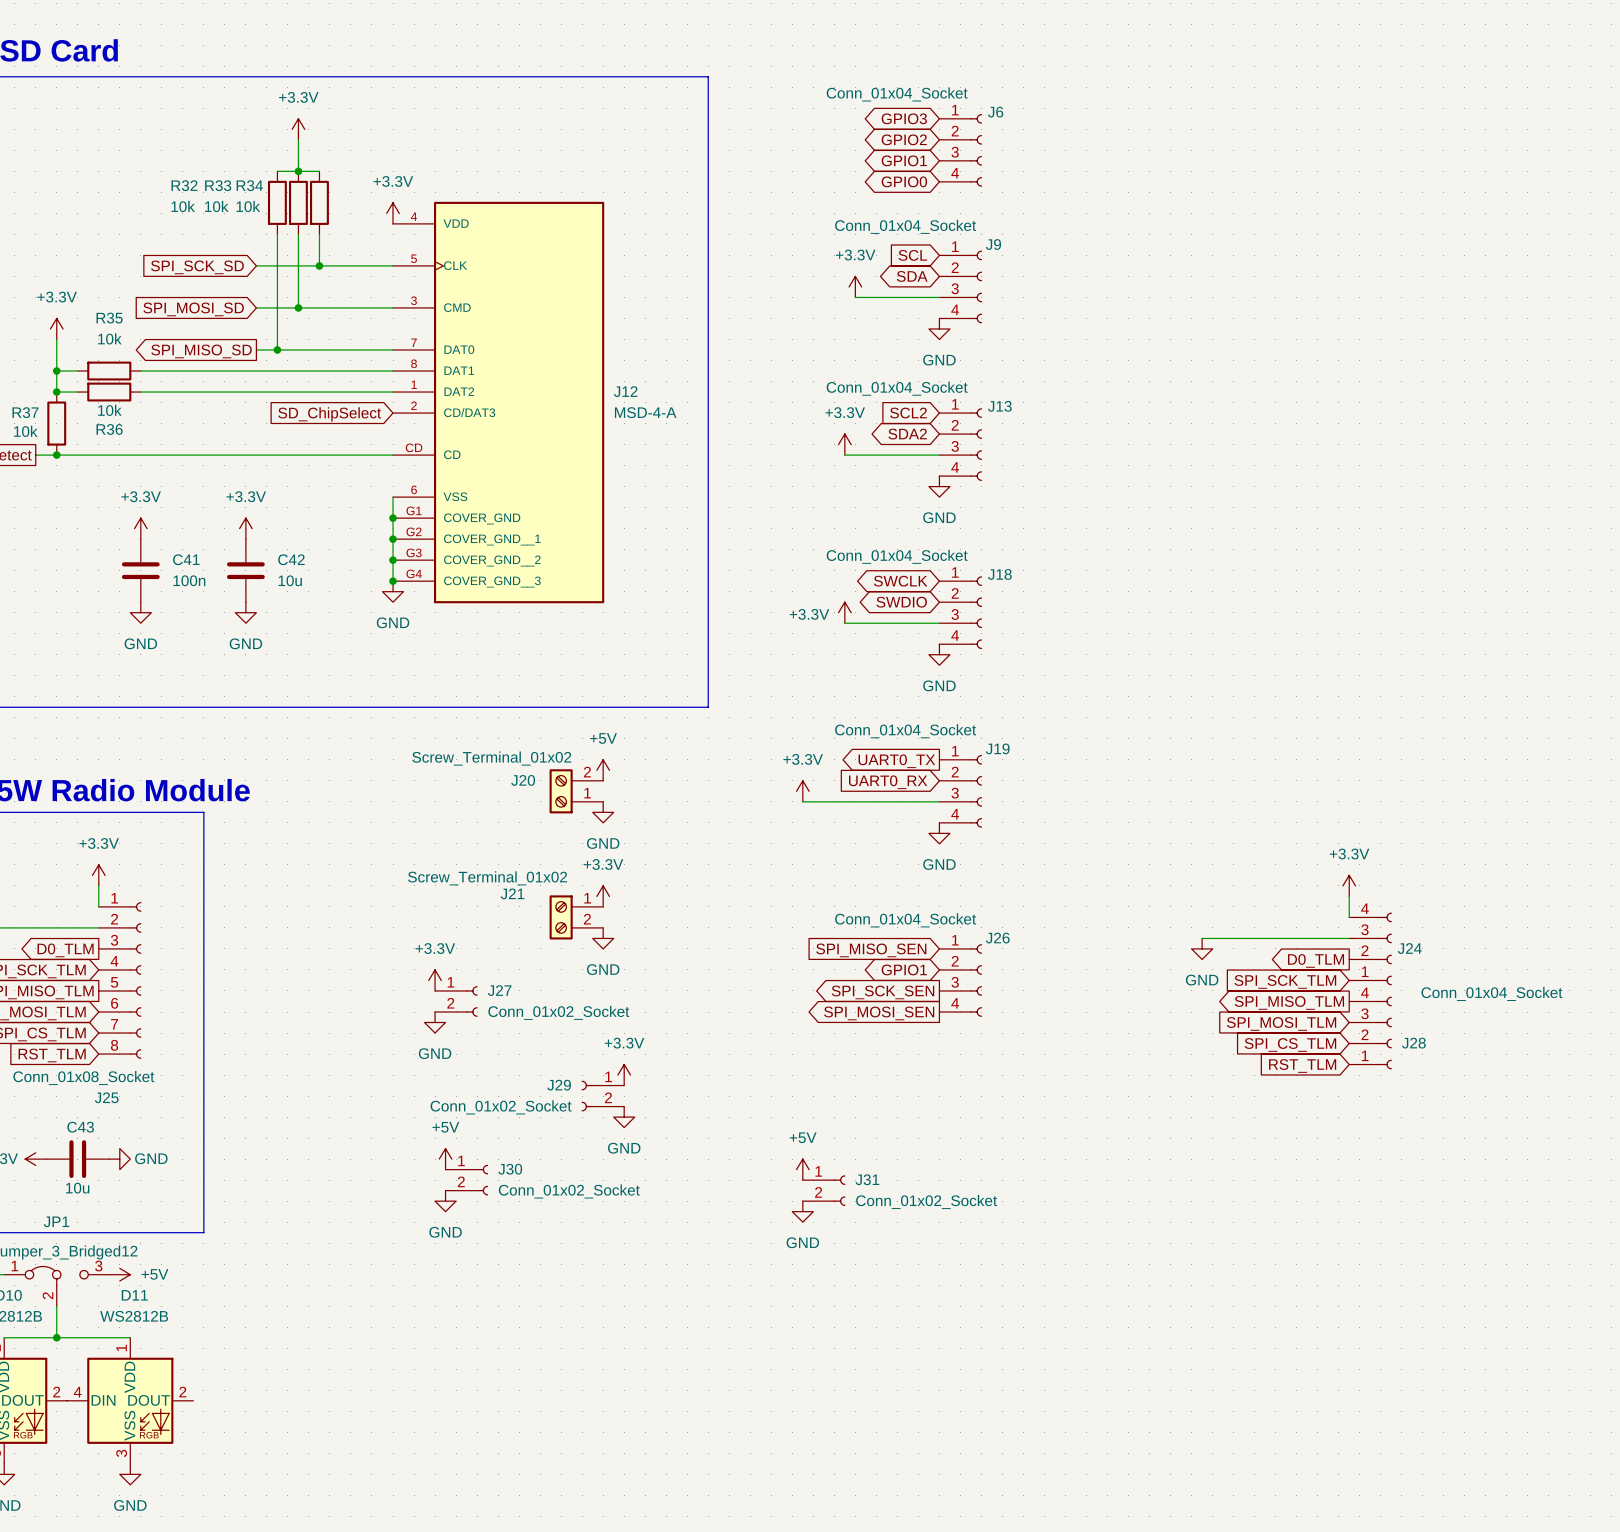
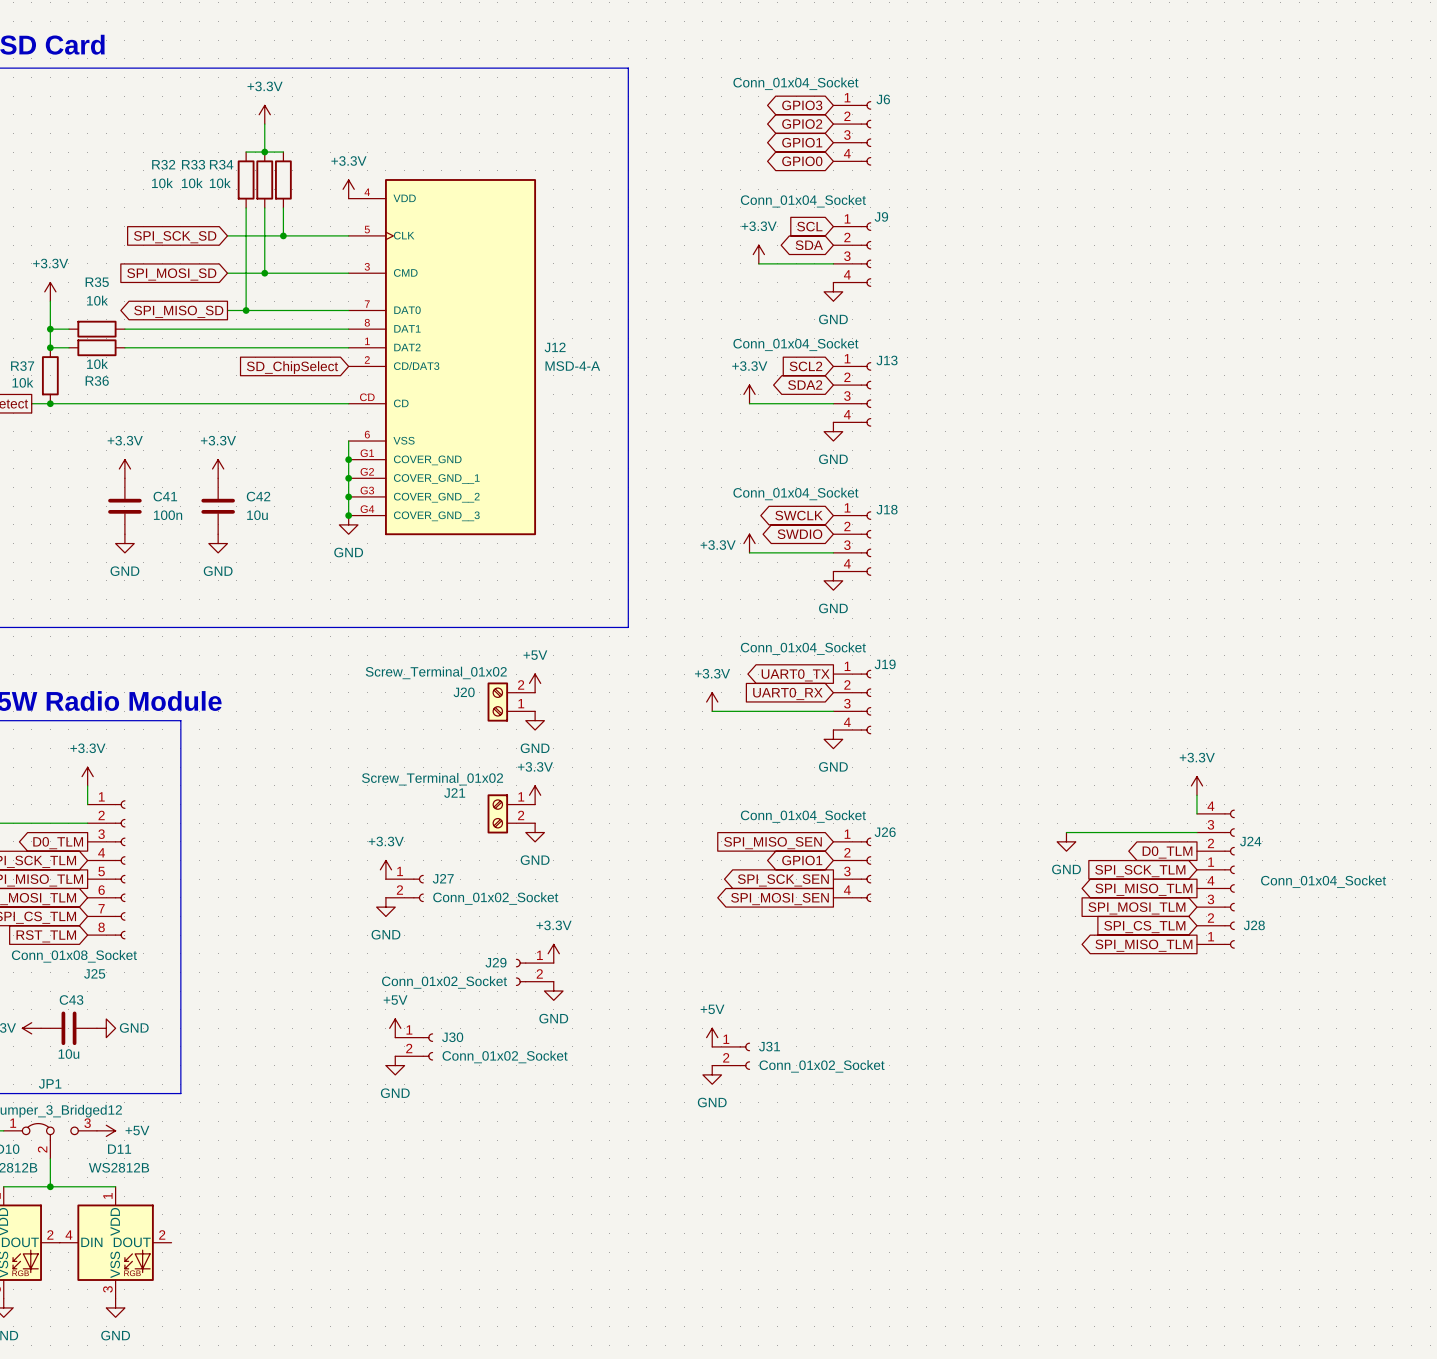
global label shape: input (1302, 1065) -> output (1143, 945)
global label: RST_TLM (1302, 1065) -> SPI_MISO_TLM (1143, 945)

